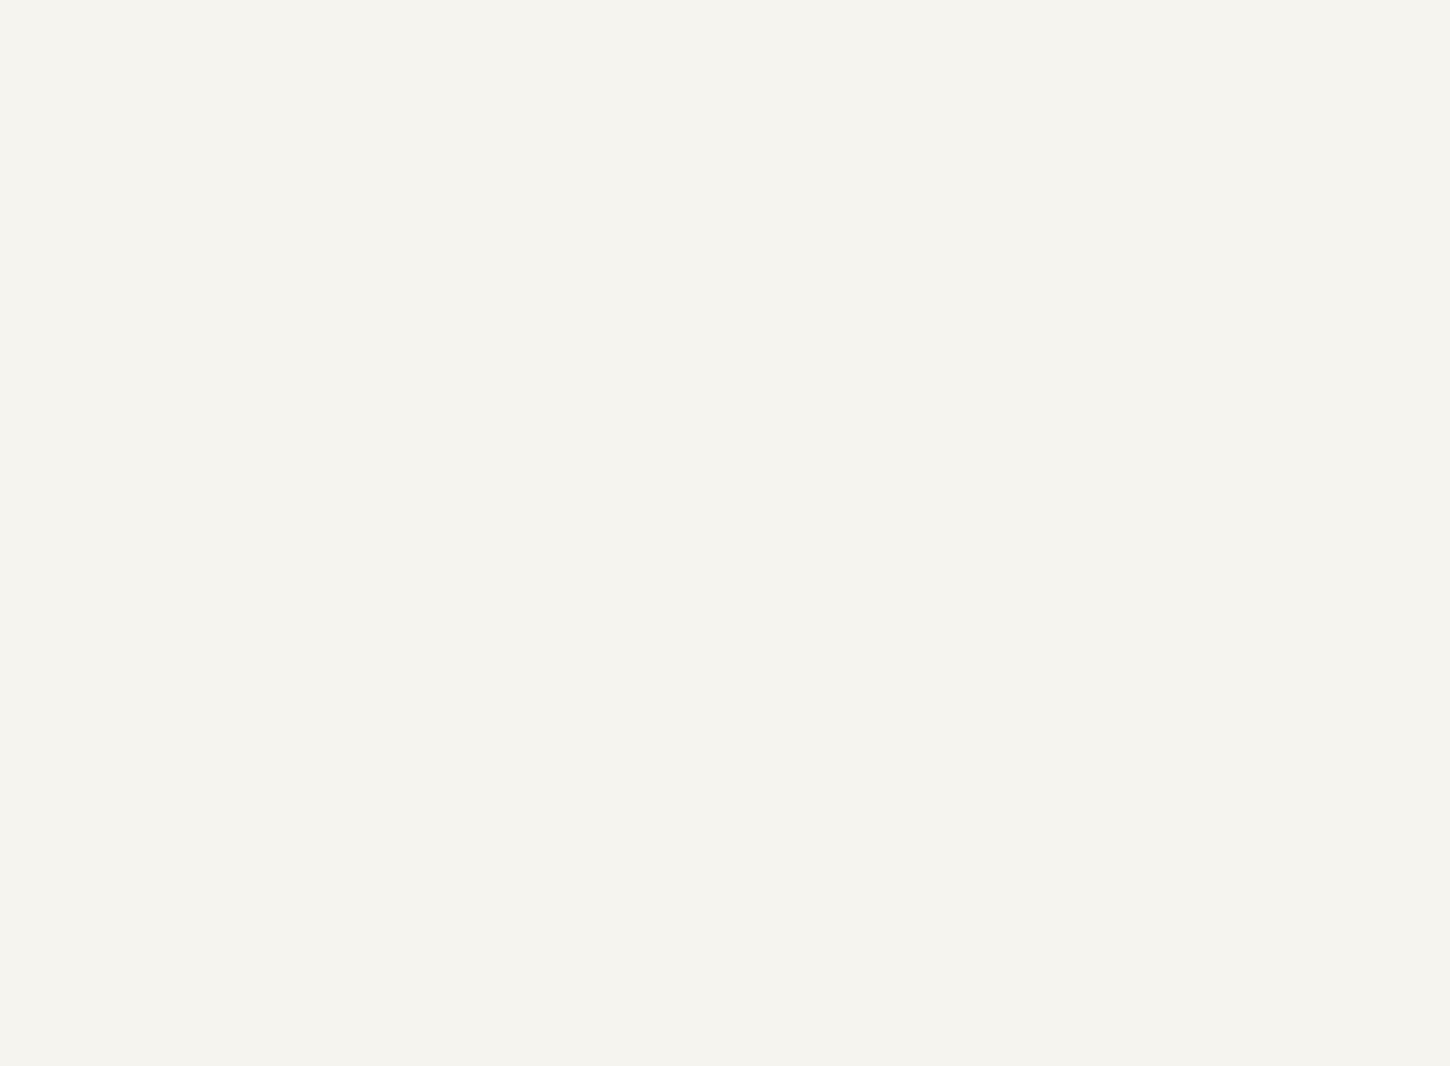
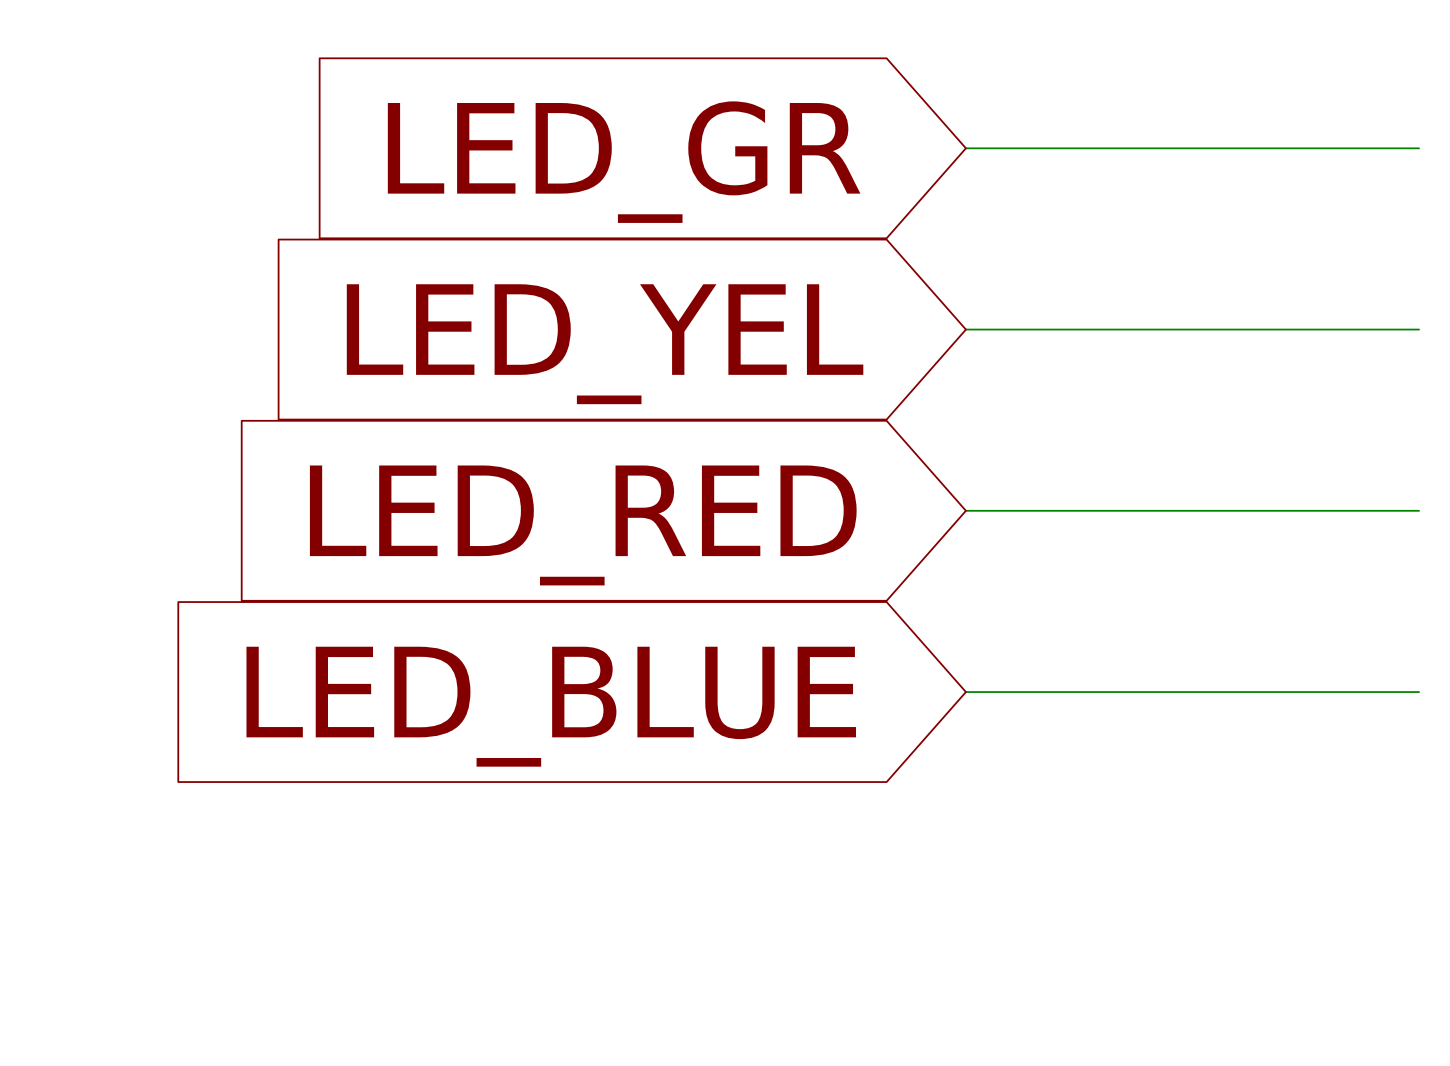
wire: none -> (965, 148) (1419, 148)
global label: none -> LED_GR (624, 162)
wire: none -> (965, 329) (1419, 329)
global label: none -> LED_YEL (605, 344)
wire: none -> (965, 510) (1419, 510)
global label: none -> LED_RED (583, 525)
wire: none -> (965, 692) (1419, 692)
global label: none -> LED_BLUE (551, 706)

